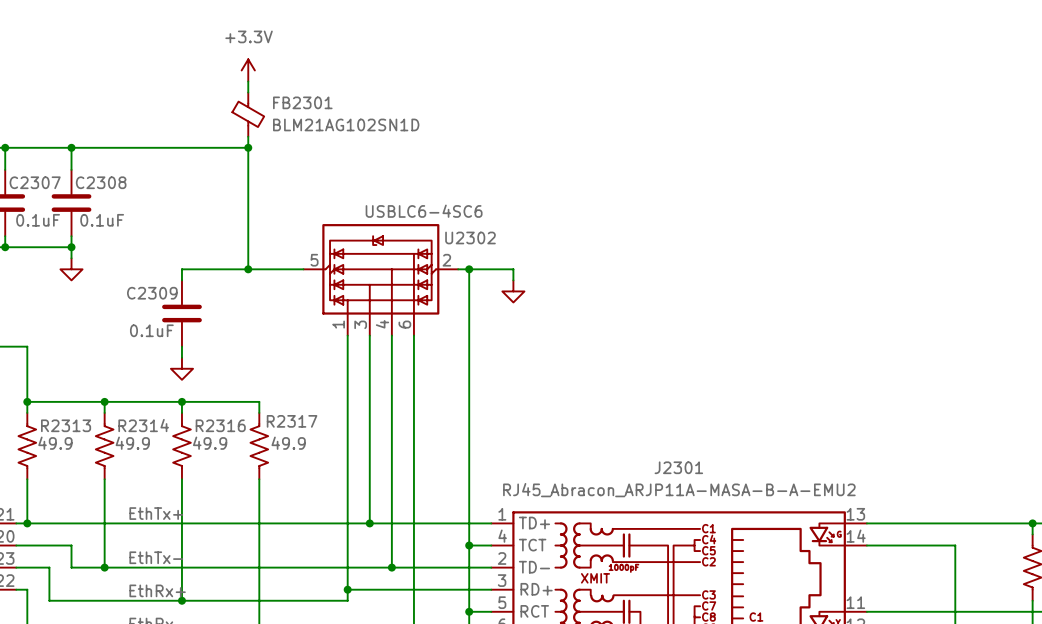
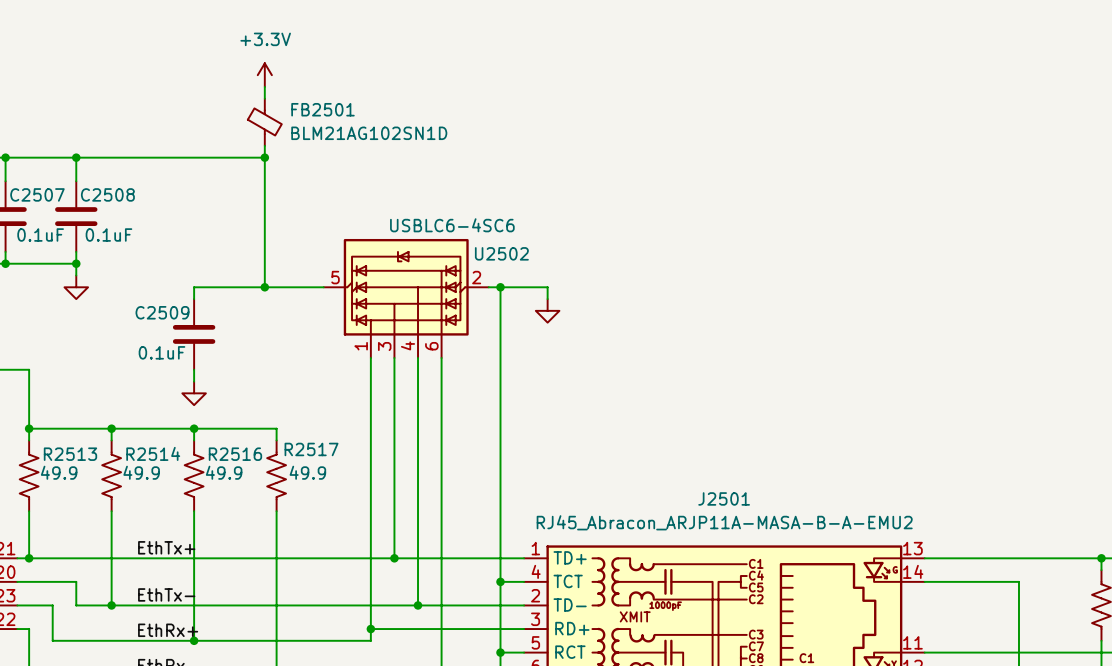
FB2301 name: FB2301 (302, 102) -> FB2501 (322, 109)
C2307 name: C2307 (35, 182) -> C2507 (37, 194)
C2308 name: C2308 (101, 182) -> C2508 (107, 194)
U2302 name: U2302 (470, 237) -> U2502 (501, 253)
C2309 name: C2309 (152, 293) -> C2509 (162, 312)
R2317 name: R2317 (292, 421) -> R2517 (311, 449)
R2313 name: R2313 (66, 425) -> R2513 (70, 454)
R2314 name: R2314 (143, 425) -> R2514 (153, 453)
R2316 name: R2316 (220, 425) -> R2516 (235, 454)
J2301 name: J2301 (678, 467) -> J2501 (724, 498)

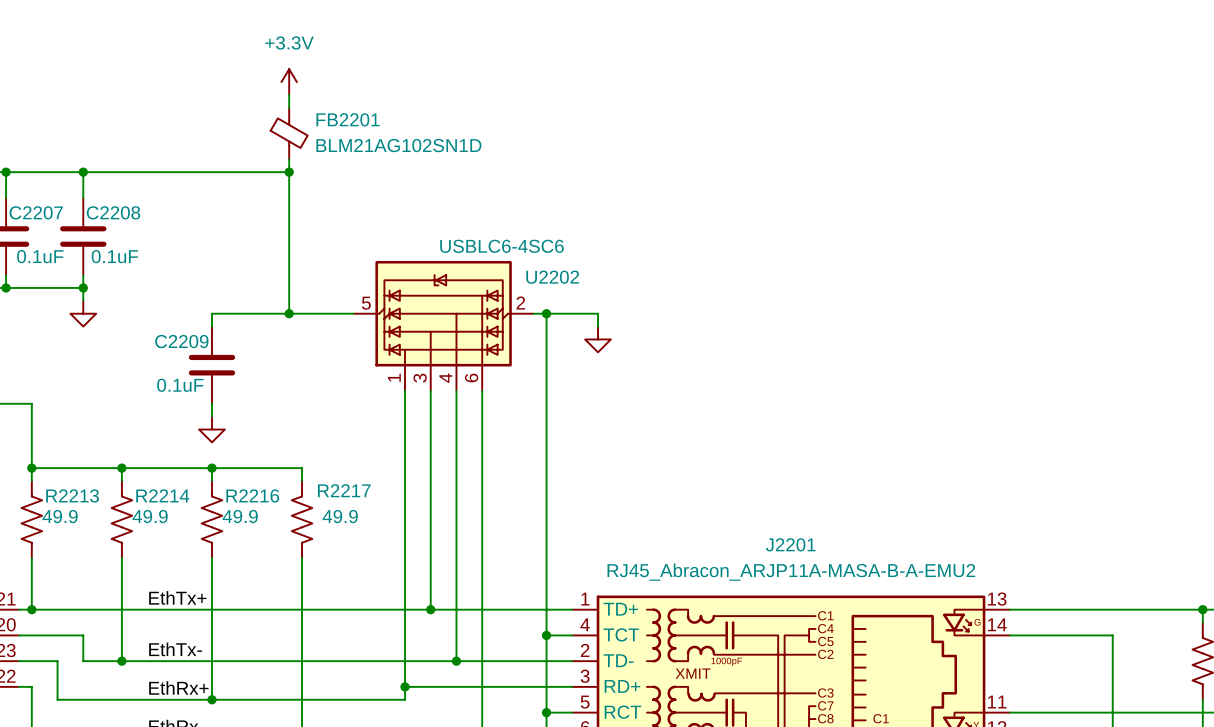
FB2501 name: FB2501 (322, 109) -> FB2201 (347, 119)
C2507 name: C2507 (37, 194) -> C2207 (36, 212)
C2508 name: C2508 (107, 194) -> C2208 (113, 212)
U2502 name: U2502 (501, 253) -> U2202 (552, 277)
C2509 name: C2509 (162, 312) -> C2209 (181, 341)
R2517 name: R2517 (311, 449) -> R2217 (344, 490)
R2514 name: R2514 (153, 453) -> R2214 (162, 495)
R2513 name: R2513 (70, 454) -> R2213 (72, 495)
R2516 name: R2516 (235, 454) -> R2216 (252, 495)
J2501 name: J2501 (724, 498) -> J2201 (790, 544)

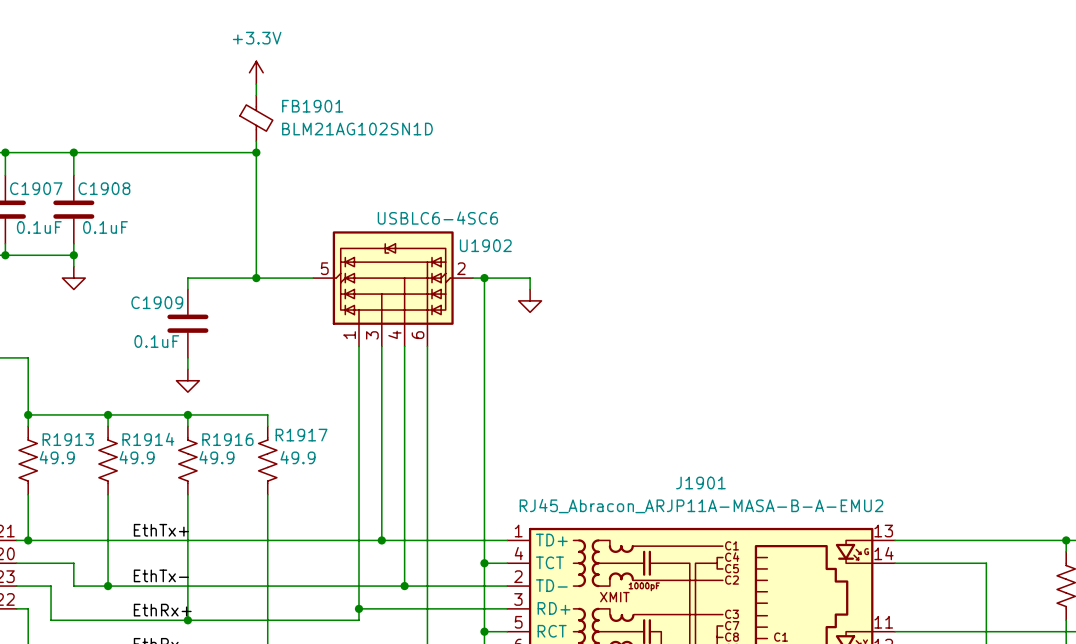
FB2201 name: FB2201 (347, 119) -> FB1901 (312, 106)
C2207 name: C2207 (36, 212) -> C1907 (36, 188)
C2208 name: C2208 (113, 212) -> C1908 (104, 188)
U2202 name: U2202 (552, 277) -> U1902 (485, 245)
C2209 name: C2209 (181, 341) -> C1909 (157, 302)
R2217 name: R2217 (344, 490) -> R1917 (301, 435)
R2213 name: R2213 (72, 495) -> R1913 (68, 439)
R2214 name: R2214 (162, 495) -> R1914 (148, 439)
R2216 name: R2216 (252, 495) -> R1916 (227, 439)
J2201 name: J2201 (790, 544) -> J1901 (700, 482)

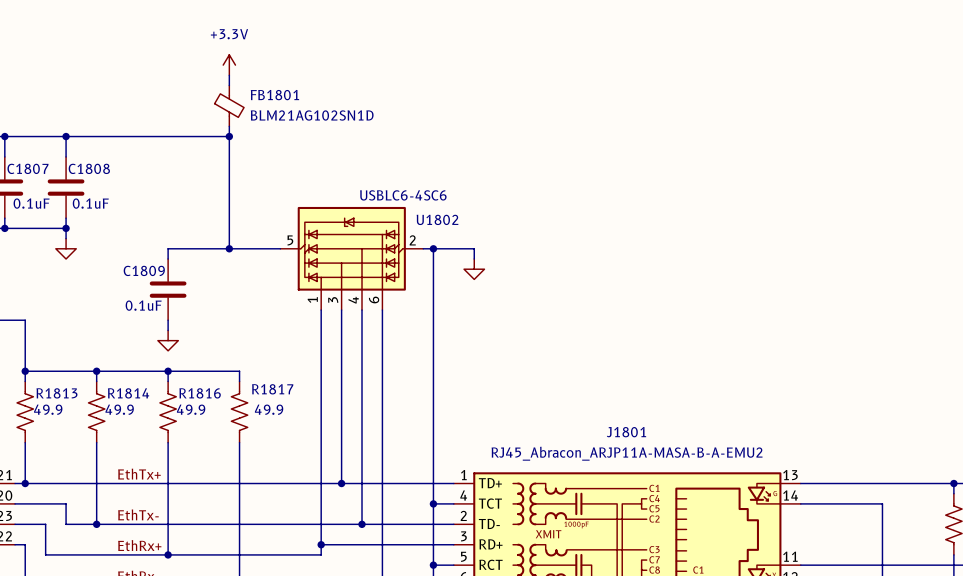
FB1901 name: FB1901 (312, 106) -> FB1801 (274, 95)
C1907 name: C1907 (36, 188) -> C1807 (27, 168)
C1908 name: C1908 (104, 188) -> C1808 (89, 168)
U1902 name: U1902 (485, 245) -> U1802 (437, 219)
C1909 name: C1909 (157, 302) -> C1809 (144, 270)
R1917 name: R1917 (301, 435) -> R1817 (272, 389)
R1913 name: R1913 (68, 439) -> R1813 (56, 393)
R1914 name: R1914 (148, 439) -> R1814 (128, 393)
R1916 name: R1916 (227, 439) -> R1816 (200, 393)
J1901 name: J1901 (700, 482) -> J1801 (626, 432)

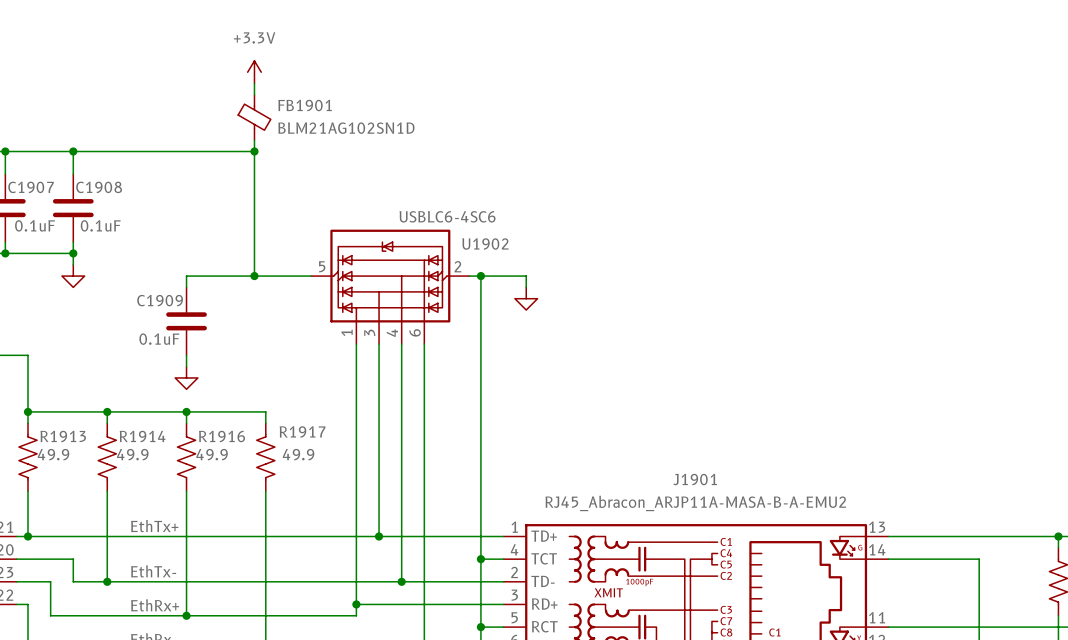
FB1801 name: FB1801 (274, 95) -> FB1901 (305, 105)
C1807 name: C1807 (27, 168) -> C1907 (31, 187)
C1808 name: C1808 (89, 168) -> C1908 (99, 187)
U1802 name: U1802 (437, 219) -> U1902 (485, 244)
C1809 name: C1809 (144, 270) -> C1909 (160, 300)
R1817 name: R1817 (272, 389) -> R1917 (302, 431)
R1813 name: R1813 (56, 393) -> R1913 (63, 436)
R1814 name: R1814 (128, 393) -> R1914 (142, 436)
R1816 name: R1816 (200, 393) -> R1916 (222, 436)
J1801 name: J1801 (626, 432) -> J1901 (695, 479)

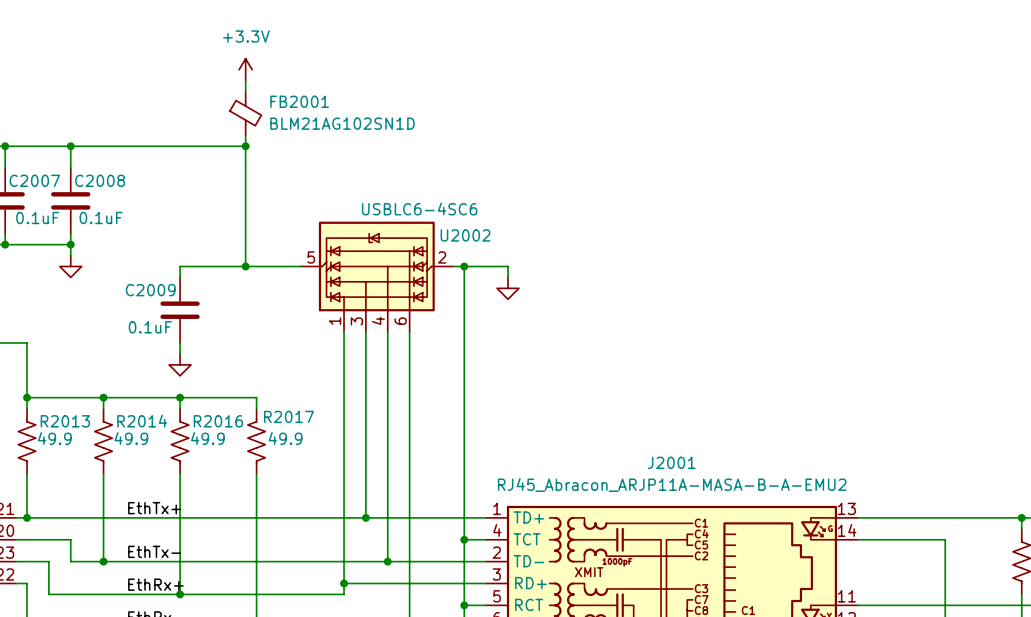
FB1901 name: FB1901 (305, 105) -> FB2001 (299, 101)
C1907 name: C1907 (31, 187) -> C2007 (34, 180)
C1908 name: C1908 (99, 187) -> C2008 (100, 180)
U1902 name: U1902 (485, 244) -> U2002 (465, 235)
C1909 name: C1909 (160, 300) -> C2009 (150, 290)
R1917 name: R1917 (302, 431) -> R2017 (288, 416)
R1913 name: R1913 (63, 436) -> R2013 (65, 421)
R1914 name: R1914 (142, 436) -> R2014 (142, 421)
R1916 name: R1916 (222, 436) -> R2016 (218, 421)
J1901 name: J1901 (695, 479) -> J2001 (671, 462)

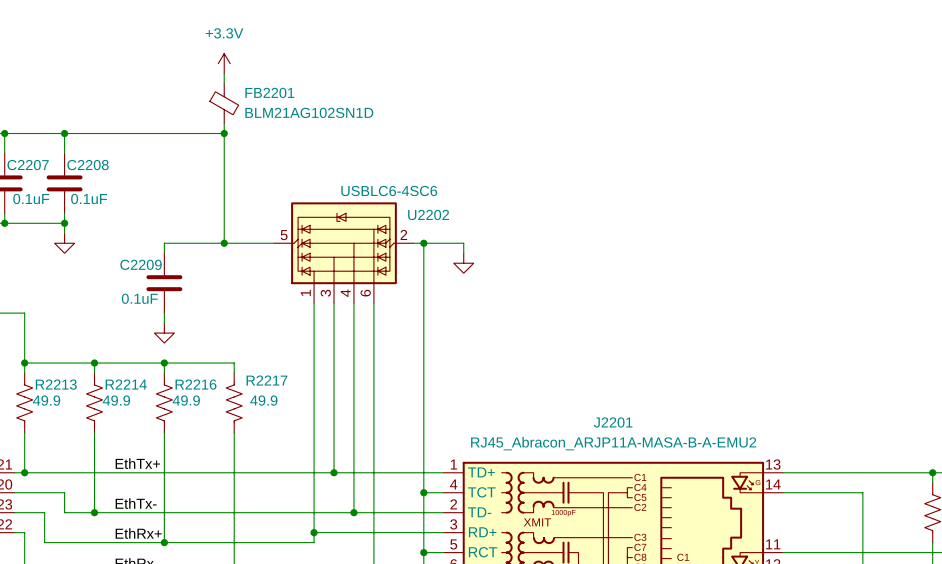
FB2001 name: FB2001 (299, 101) -> FB2201 (269, 92)
C2007 name: C2007 (34, 180) -> C2207 (28, 165)
C2008 name: C2008 (100, 180) -> C2208 (88, 165)
U2002 name: U2002 (465, 235) -> U2202 (428, 214)
C2009 name: C2009 (150, 290) -> C2209 (141, 264)
R2017 name: R2017 (288, 416) -> R2217 (266, 380)
R2013 name: R2013 (65, 421) -> R2213 (56, 384)
R2014 name: R2014 (142, 421) -> R2214 (126, 384)
R2016 name: R2016 (218, 421) -> R2216 (195, 384)
J2001 name: J2001 (671, 462) -> J2201 (613, 422)

